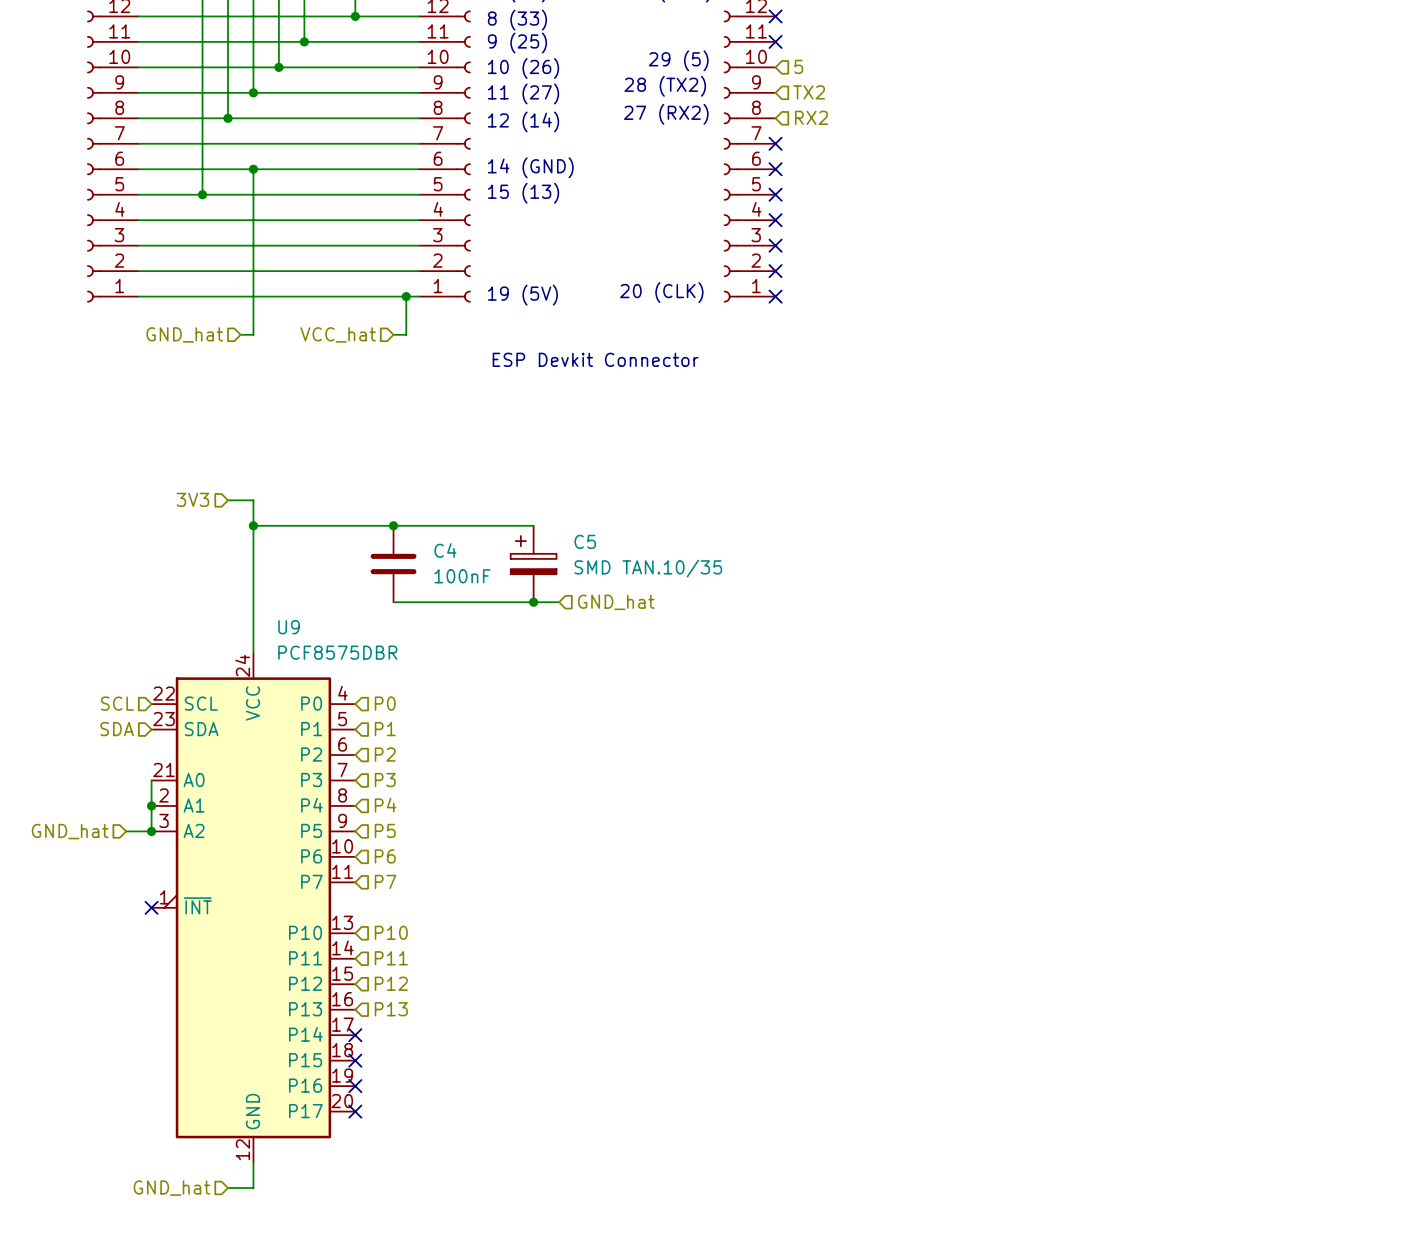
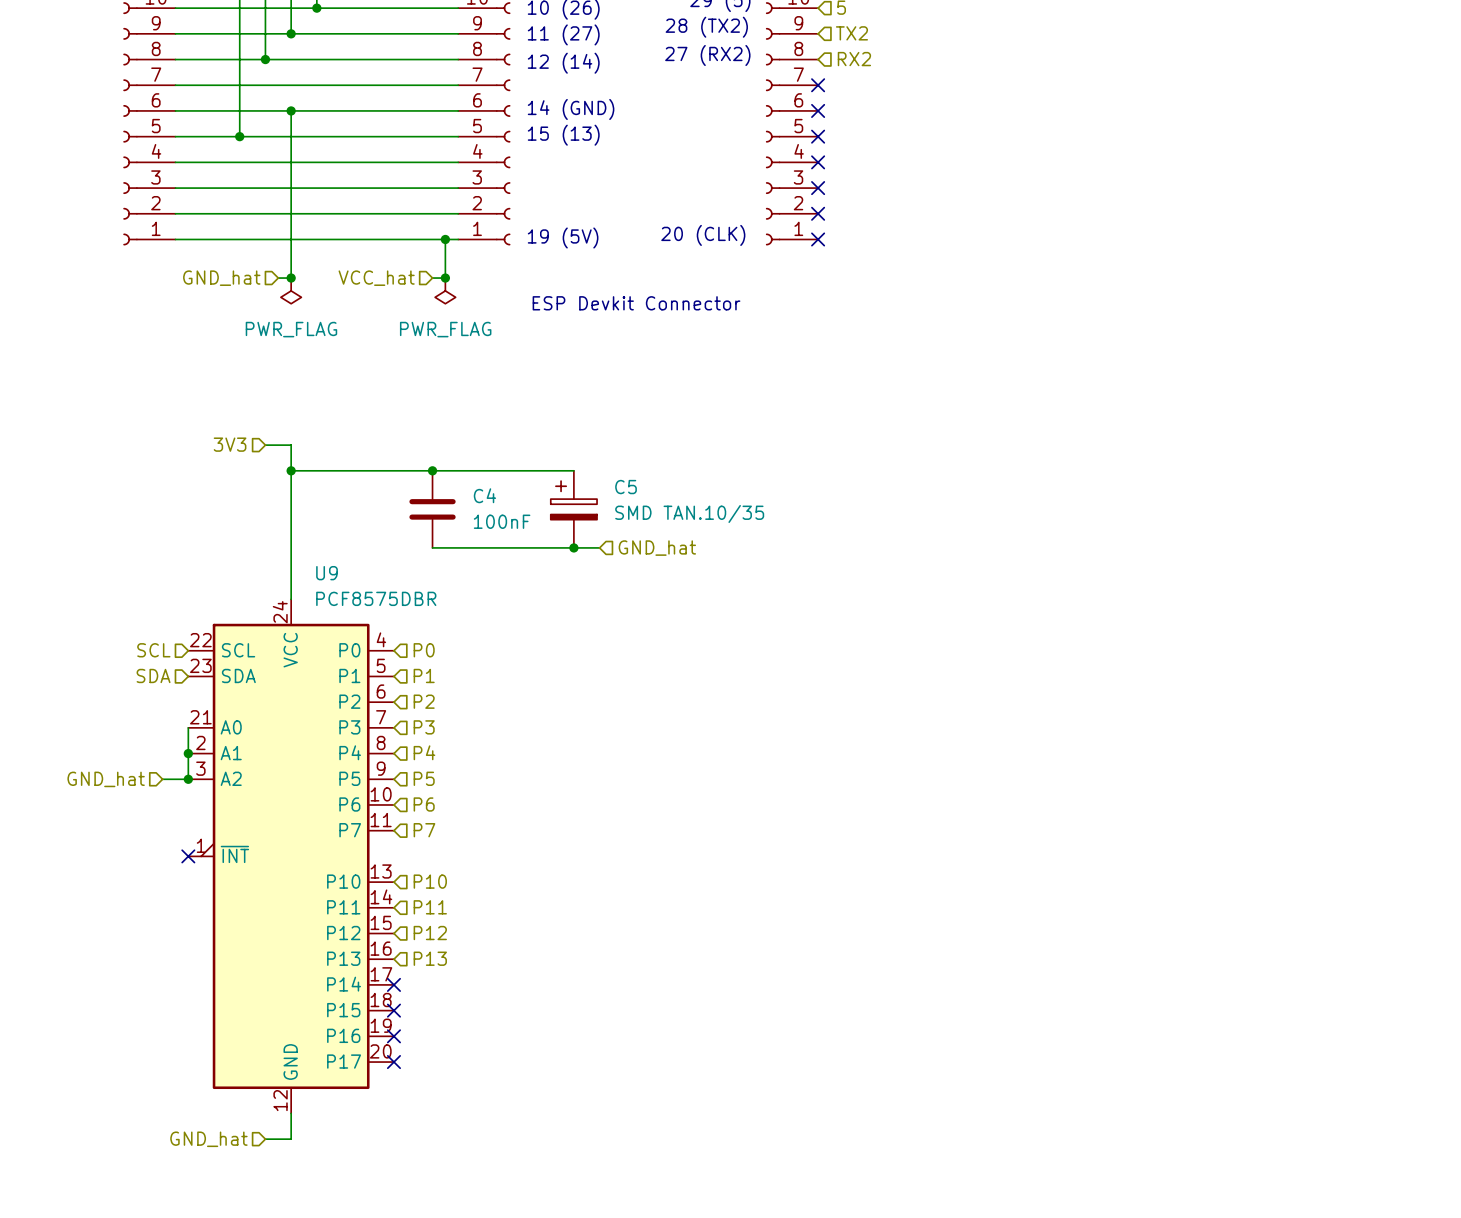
junction: none -> (291, 278)
junction: none -> (445, 278)
power symbol: none -> PWR_FLAG (291, 290)
power symbol: none -> PWR_FLAG (445, 290)

